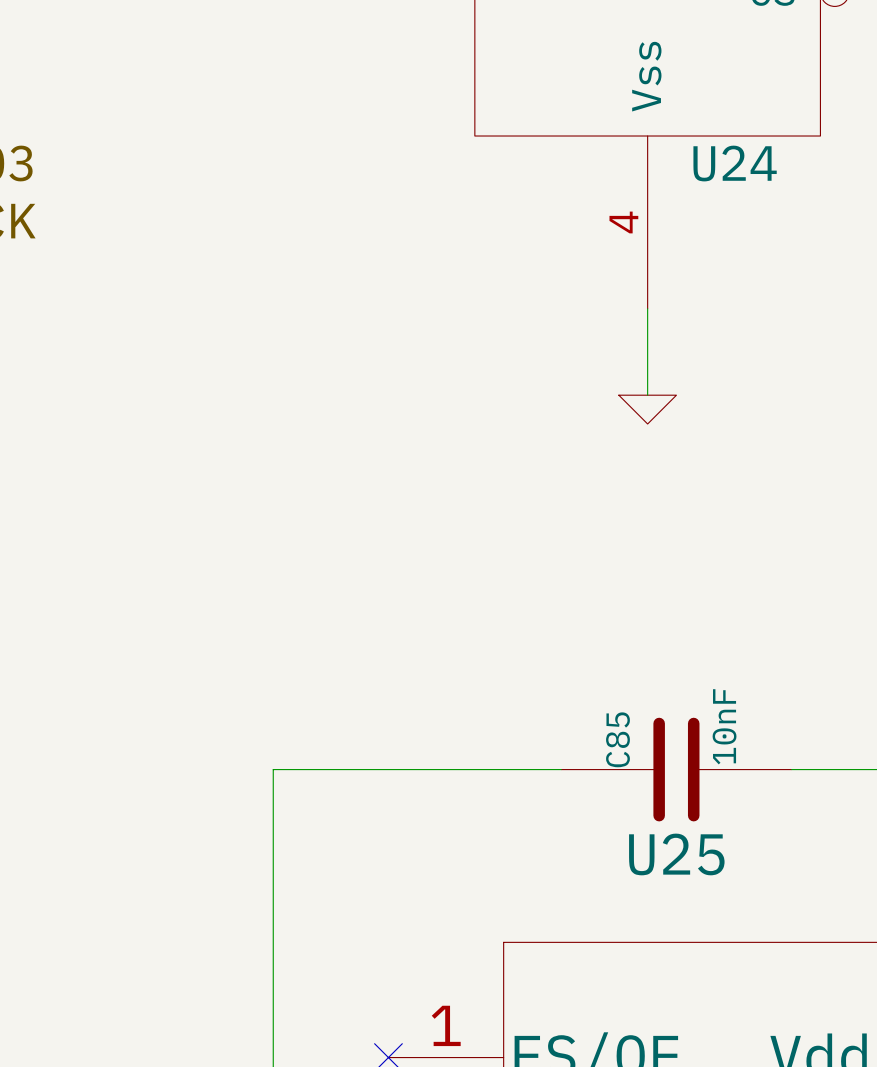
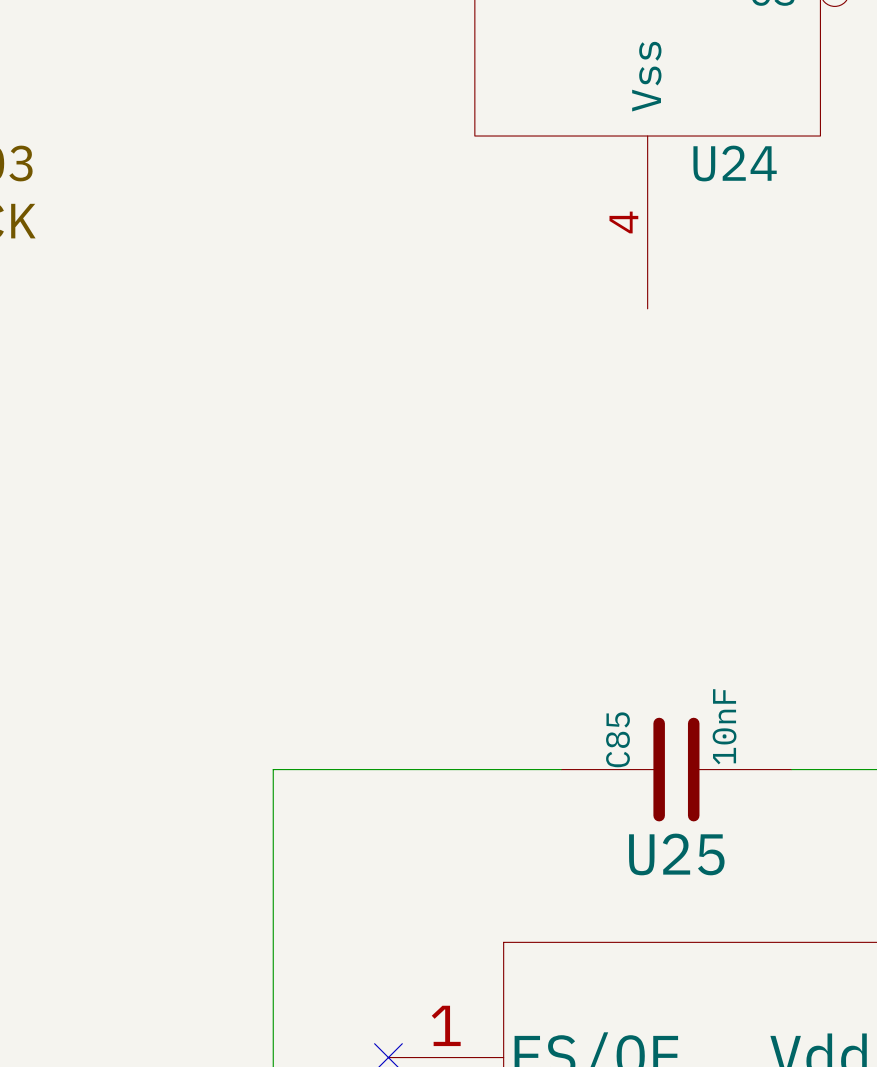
wire: (647, 308) (647, 395) -> none
power symbol: (647, 409) -> none

